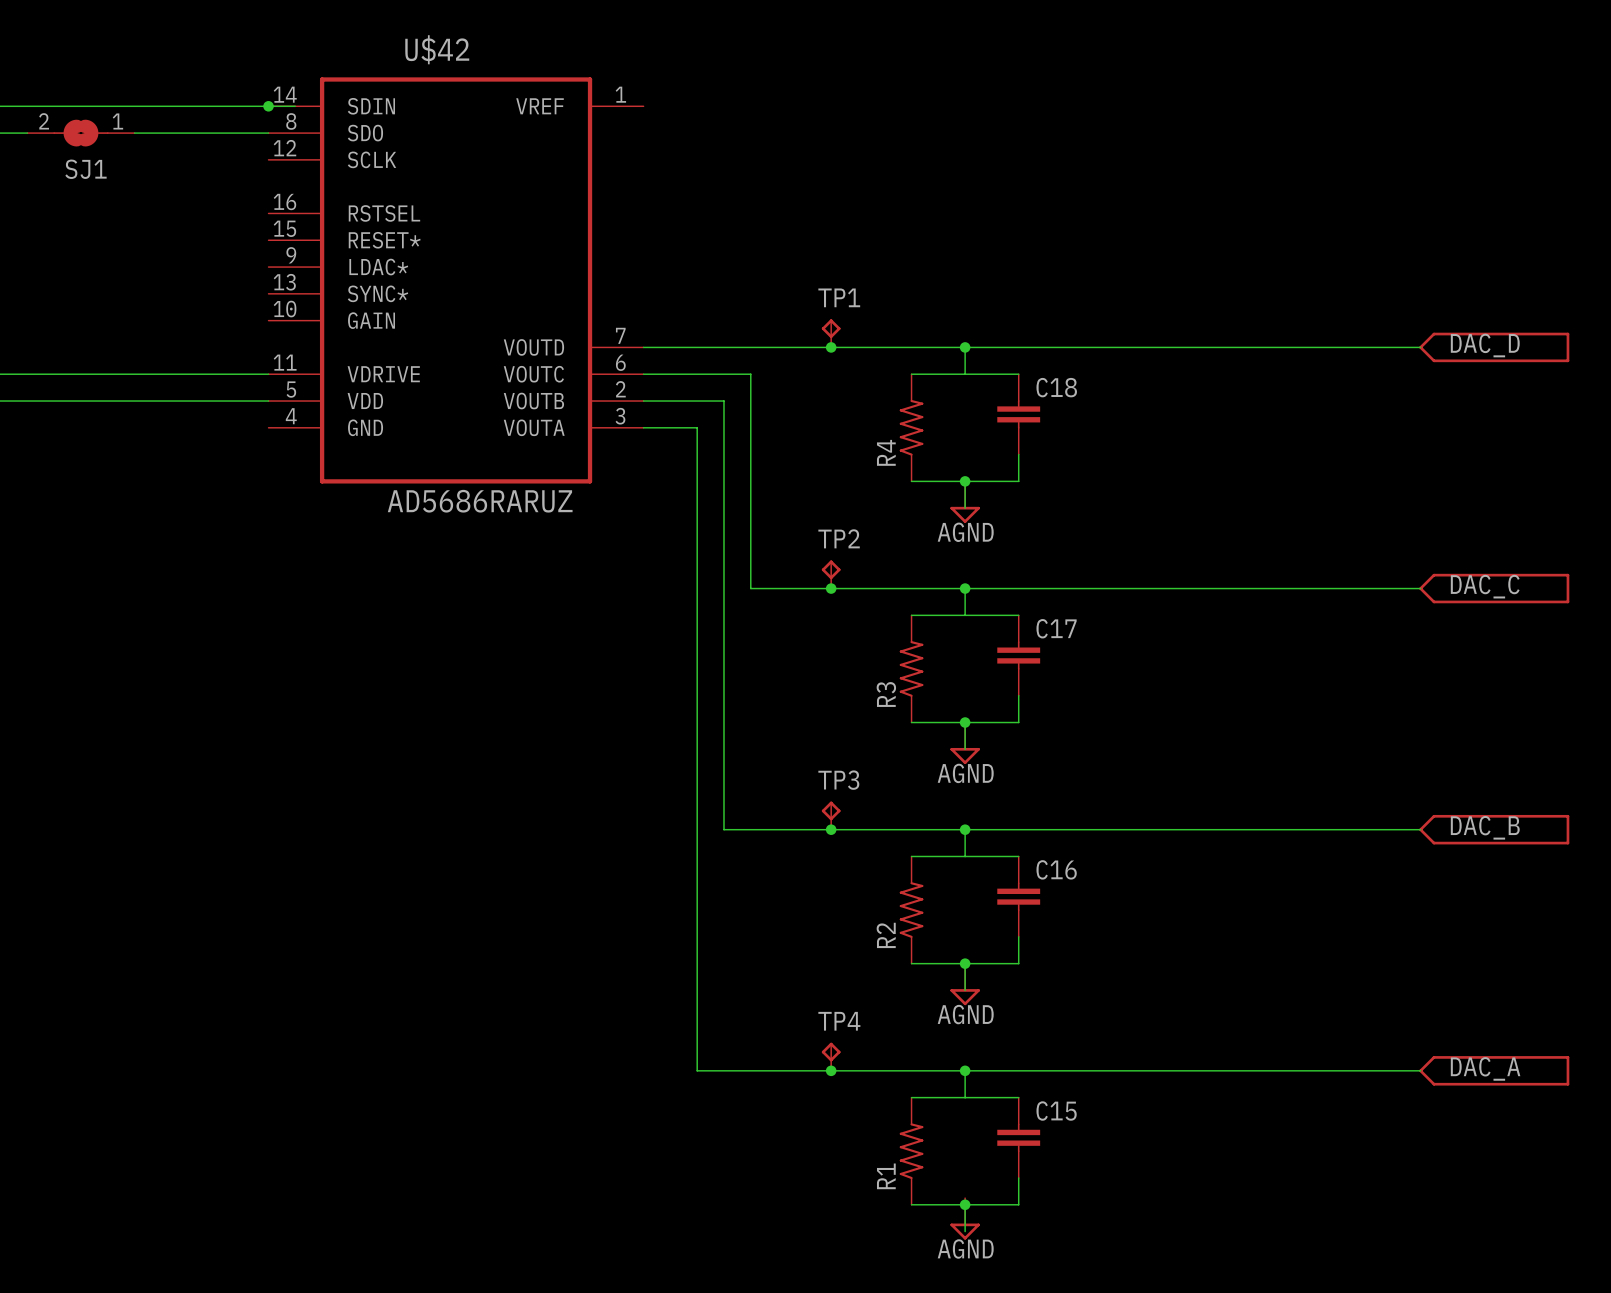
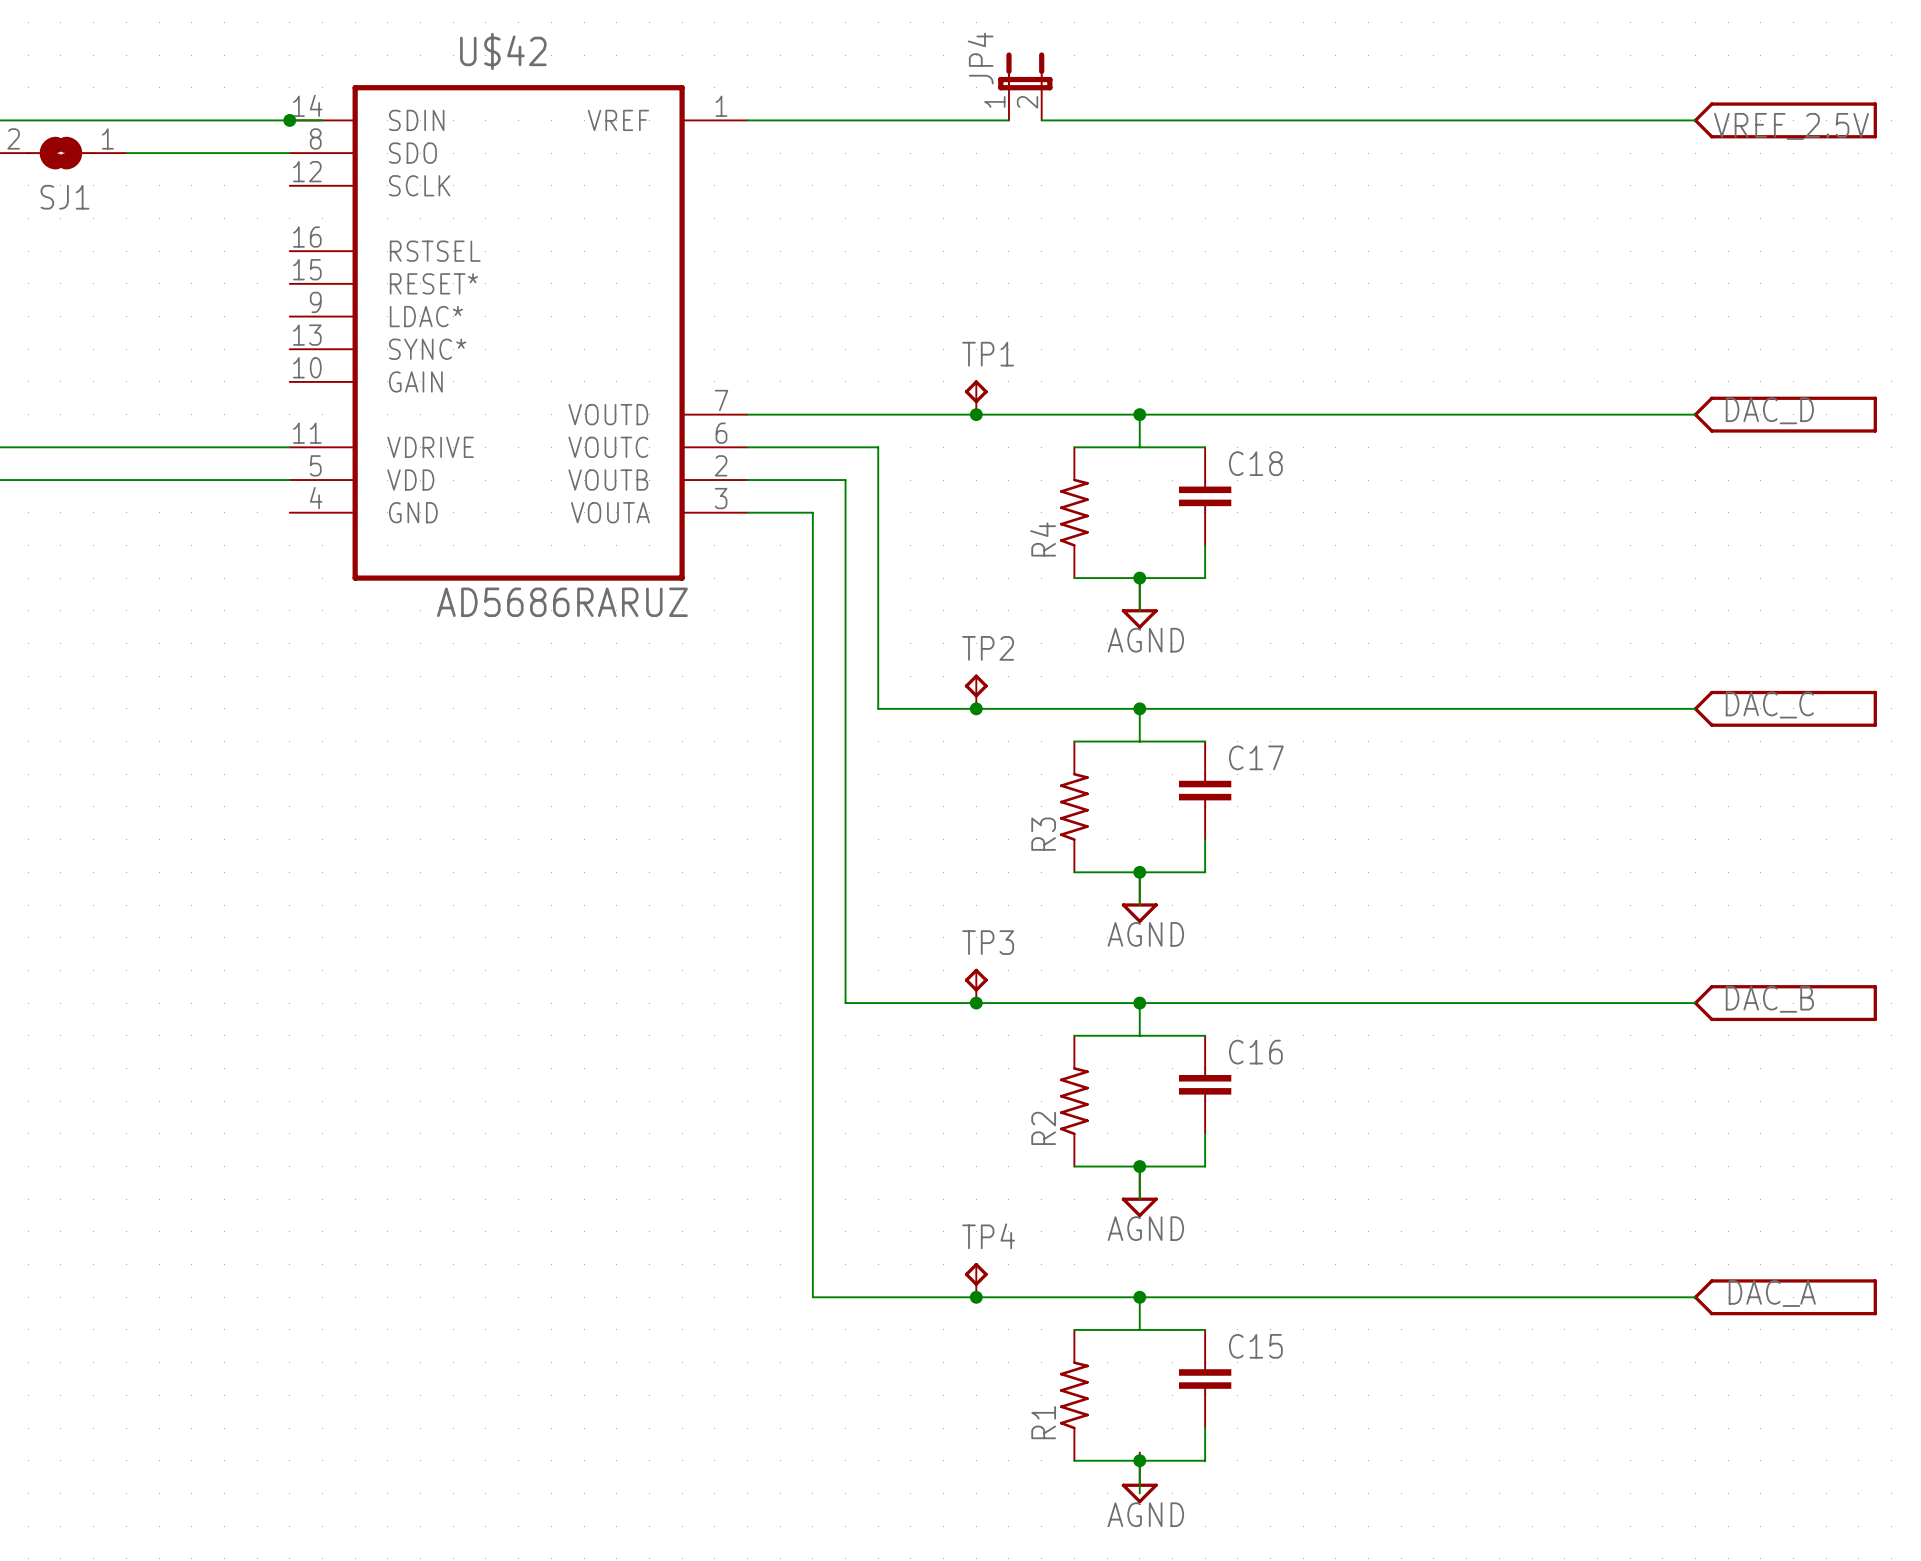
JP4: none -> (1025, 86)
wire: none -> (747, 120) (1008, 120)
wire: none -> (1041, 120) (1695, 120)
part: none -> (1785, 120)
label: none -> VREF_2.5V (1791, 126)

